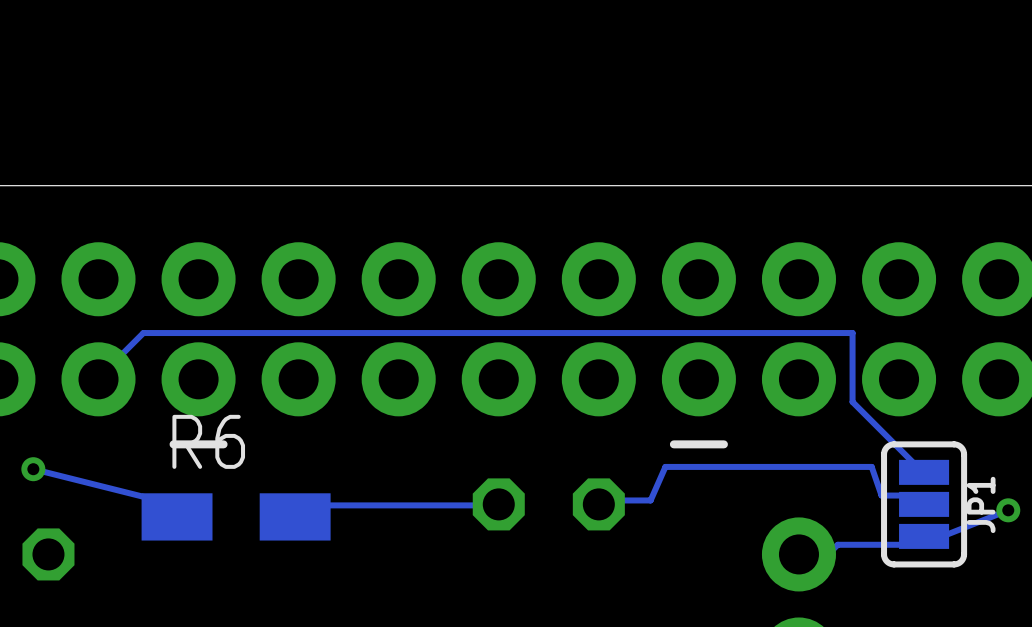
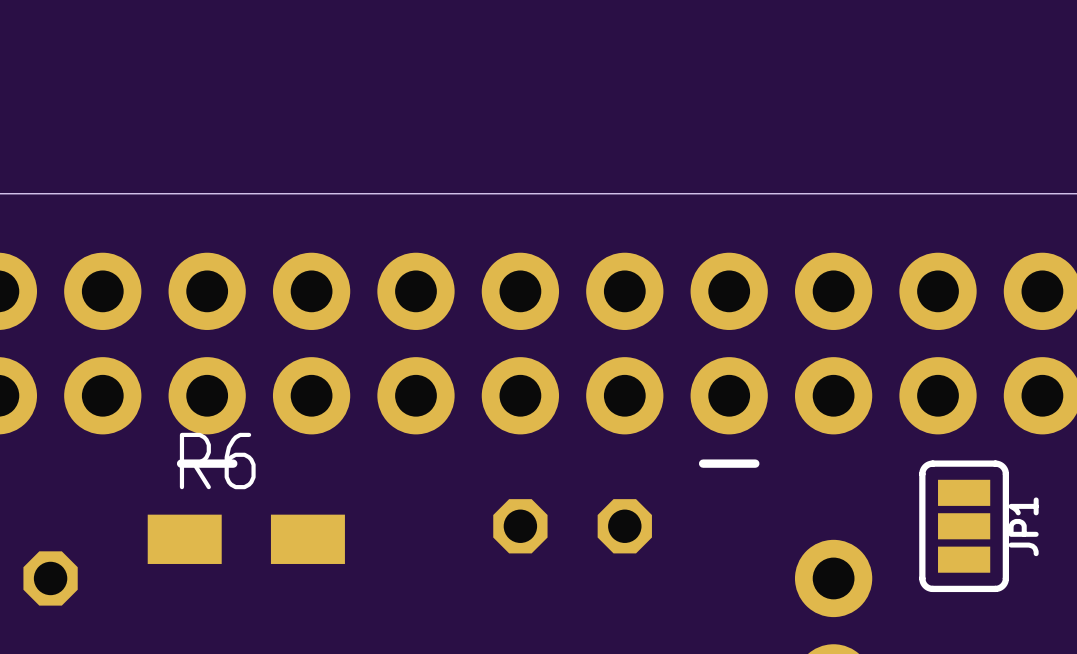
track: (98, 379) (143, 333) (852, 333) (852, 401) (924, 472) -> none
track: (33, 469) (158, 500) (177, 516) -> none
via: (33, 469) -> none
track: (498, 504) (305, 505) (295, 516) -> none
track: (924, 504) (916, 495) (881, 495) (871, 466) (665, 466) (650, 500) (601, 500) (598, 504) -> none
track: (1008, 510) (946, 534) (926, 534) (916, 544) (837, 544) (832, 549) (803, 549) (798, 554) -> none
via: (1008, 510) -> none

